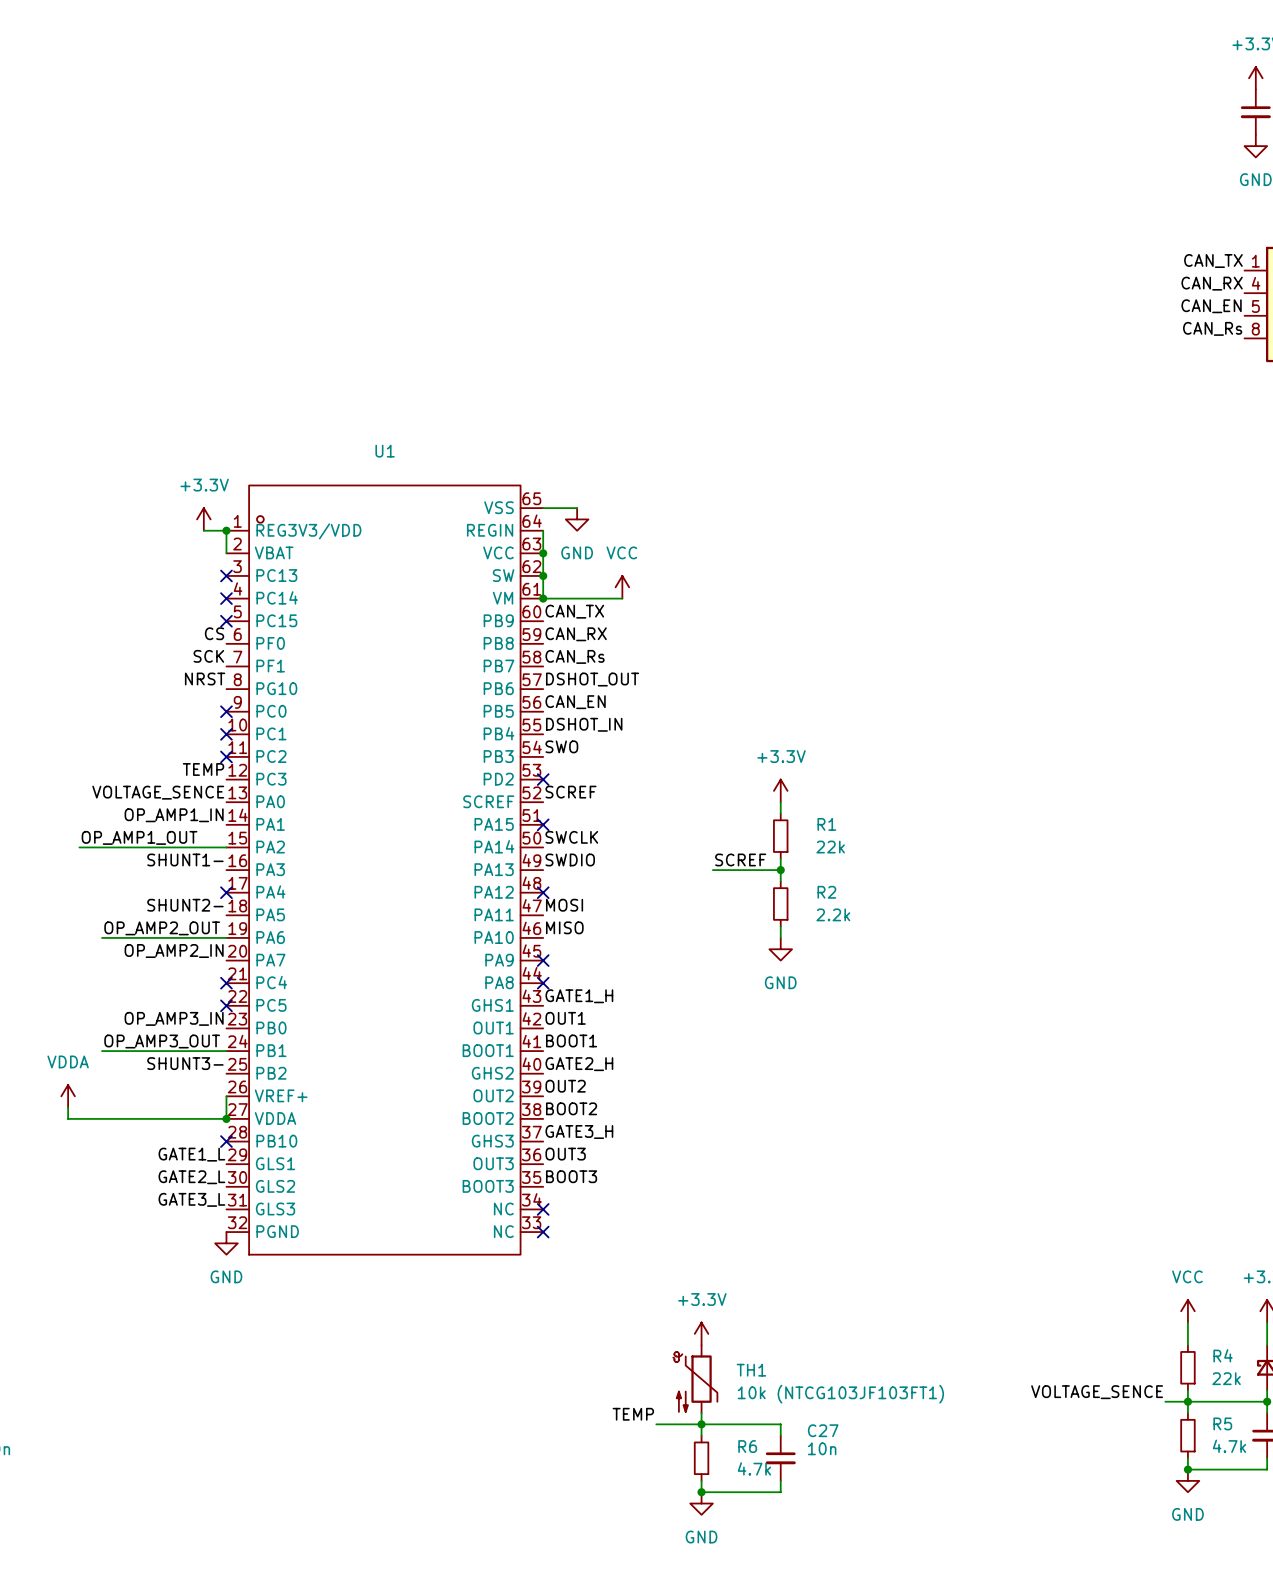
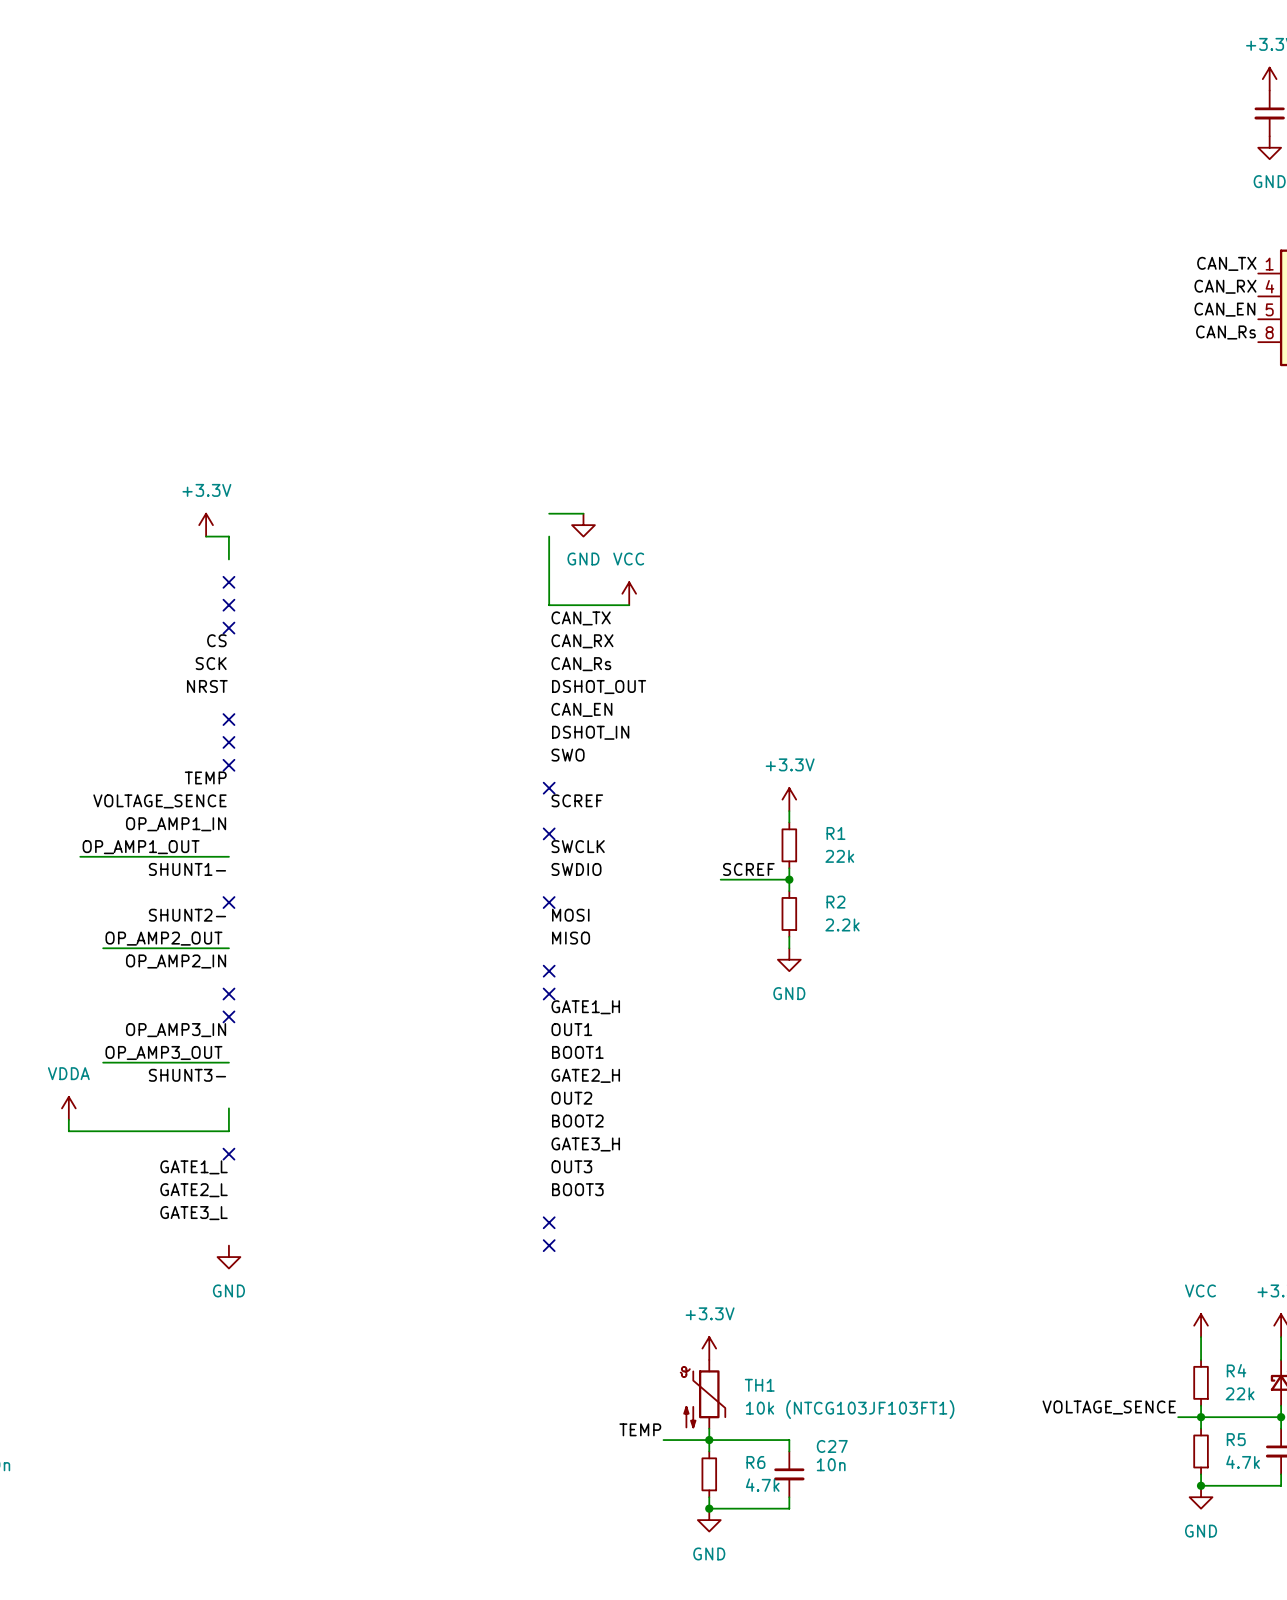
junction: (226, 530) -> none
junction: (543, 553) -> none
junction: (543, 575) -> none
junction: (543, 598) -> none
U1: (384, 870) -> none
junction: (226, 1118) -> none

